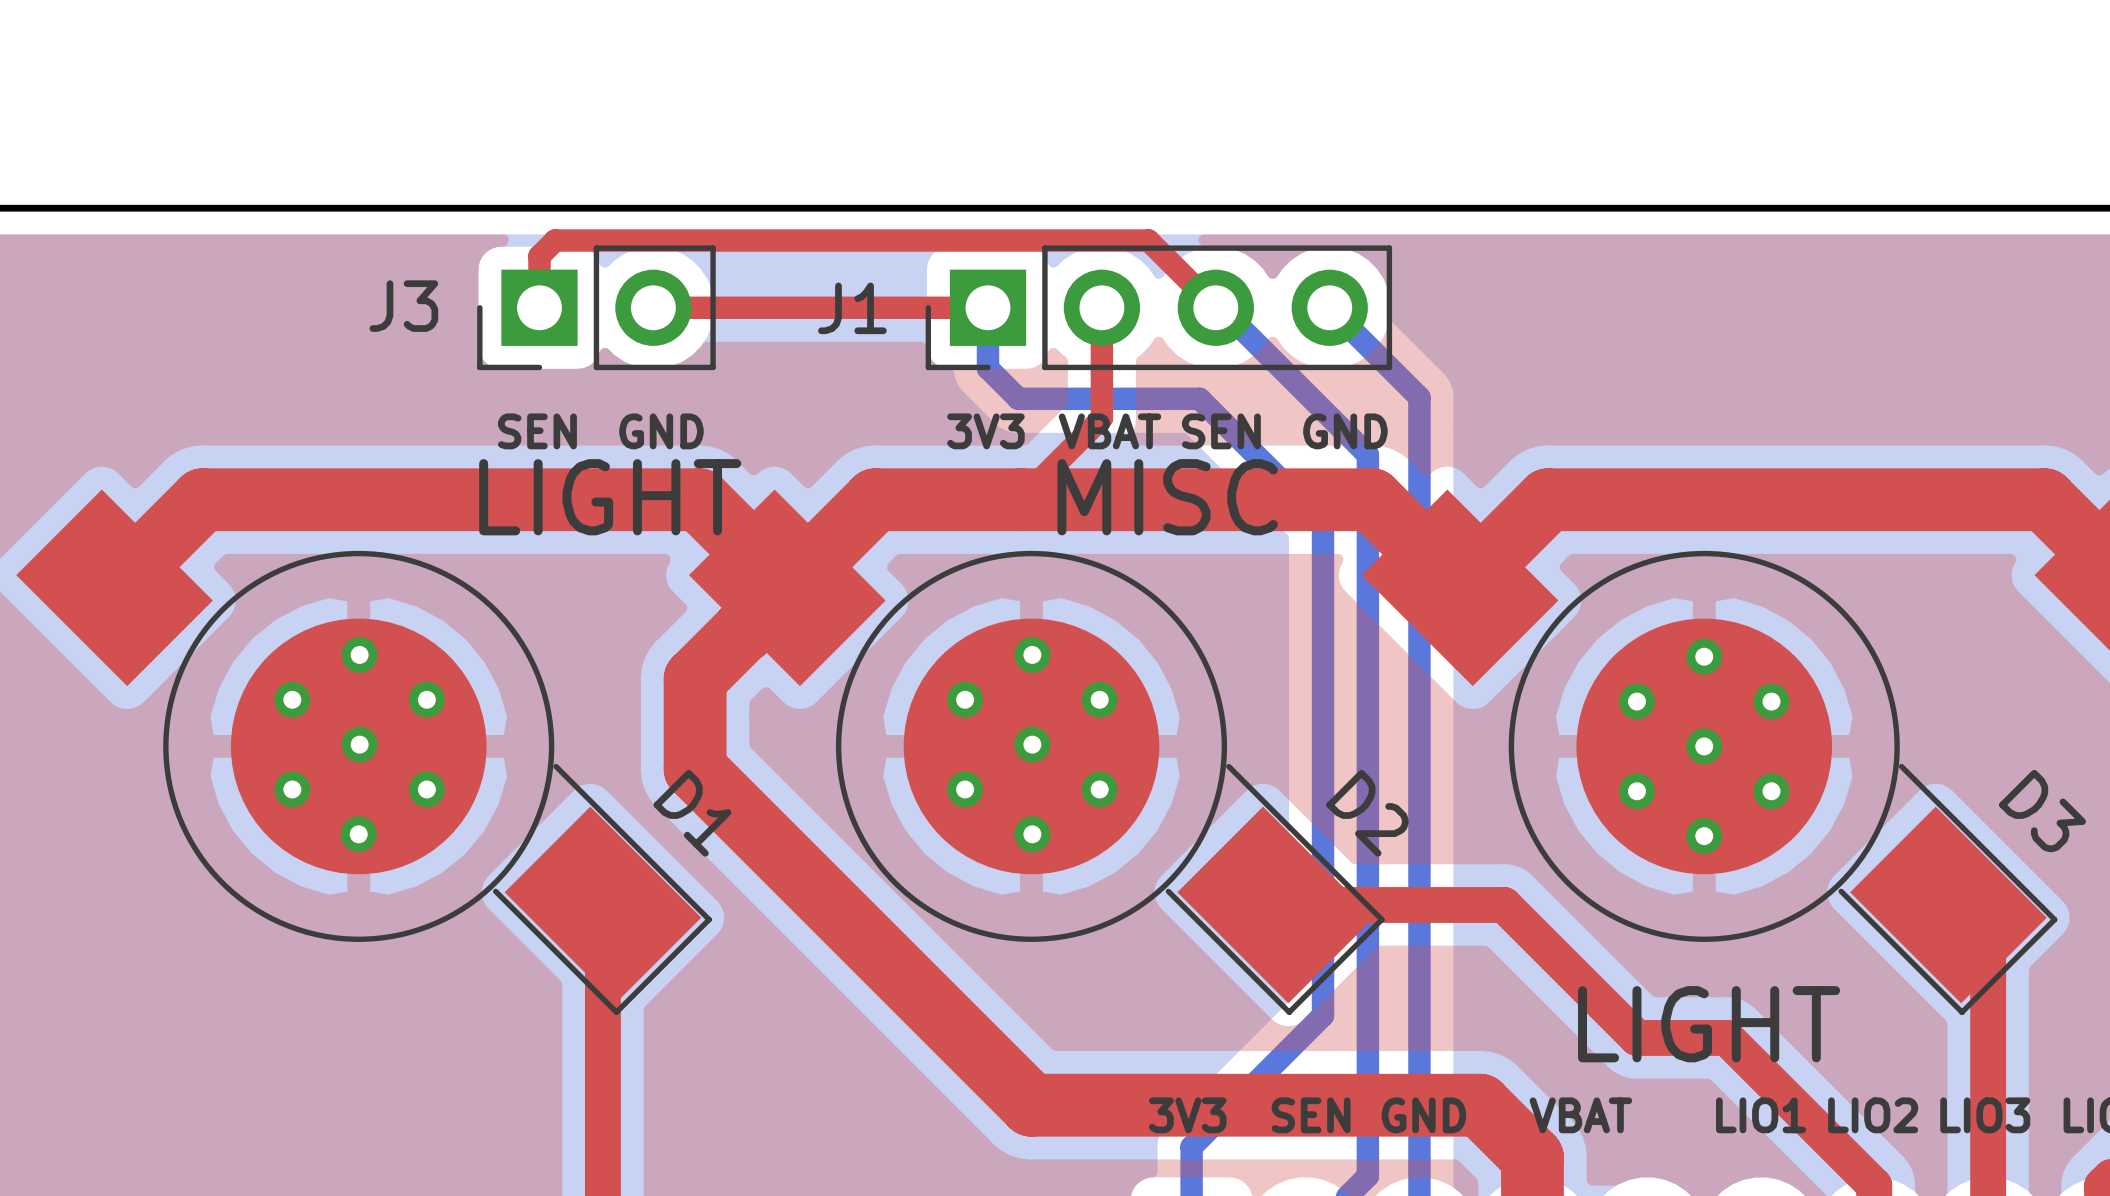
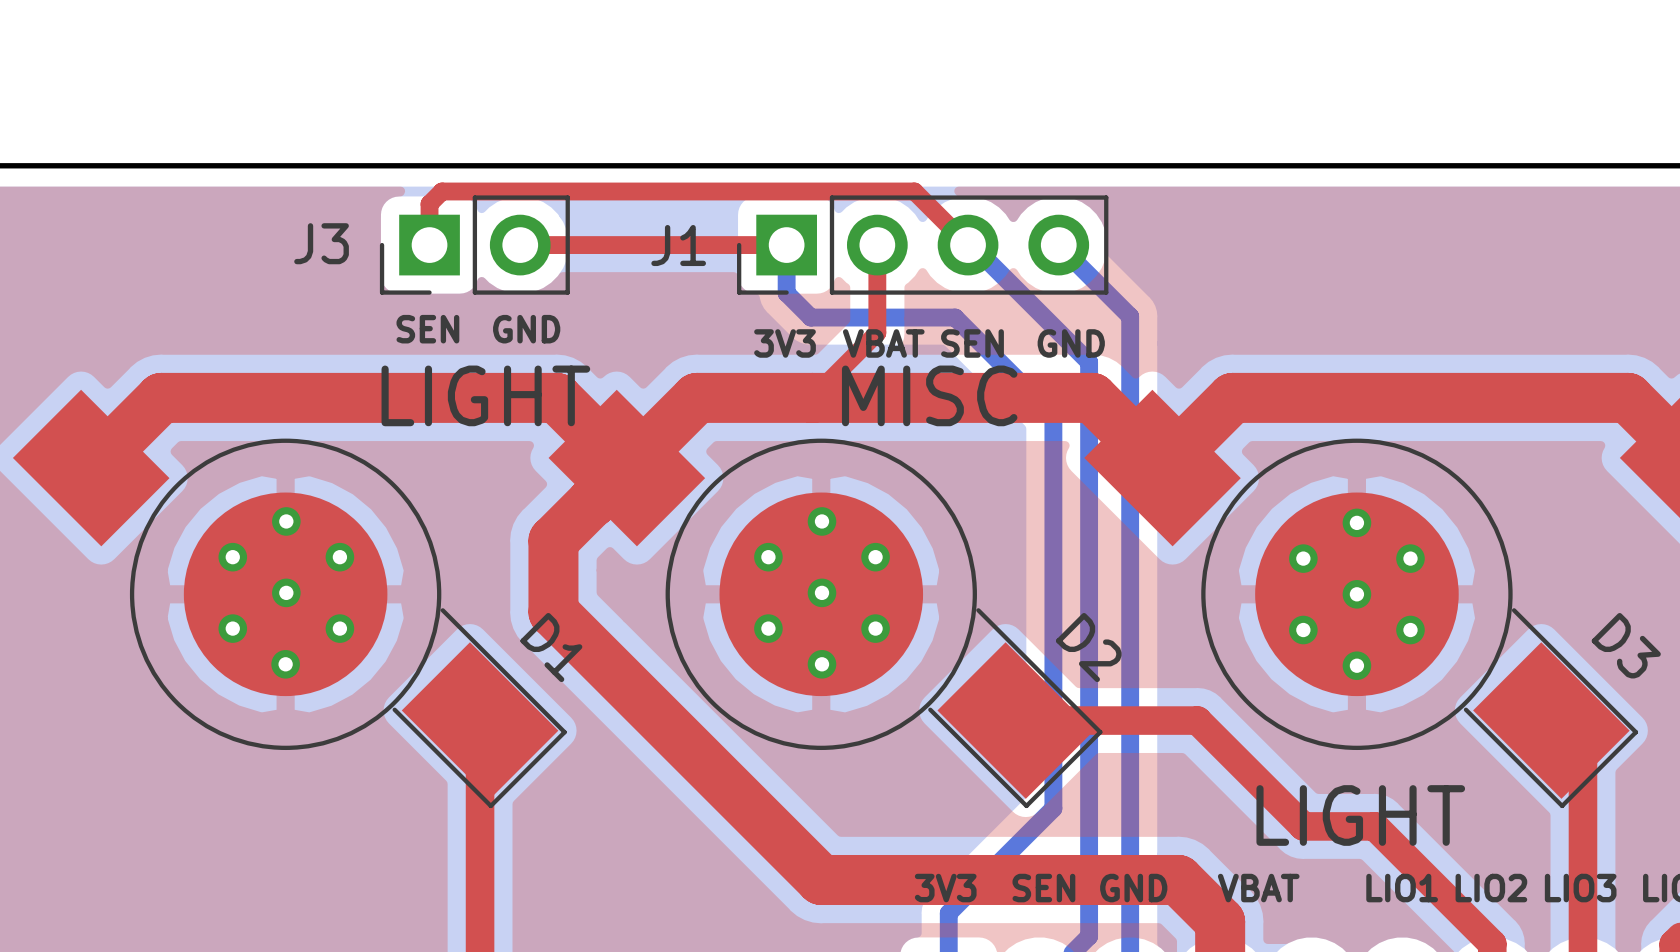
text position: SEN (537, 431) -> SEN (427, 329)
text position: GND (661, 431) -> GND (526, 329)

